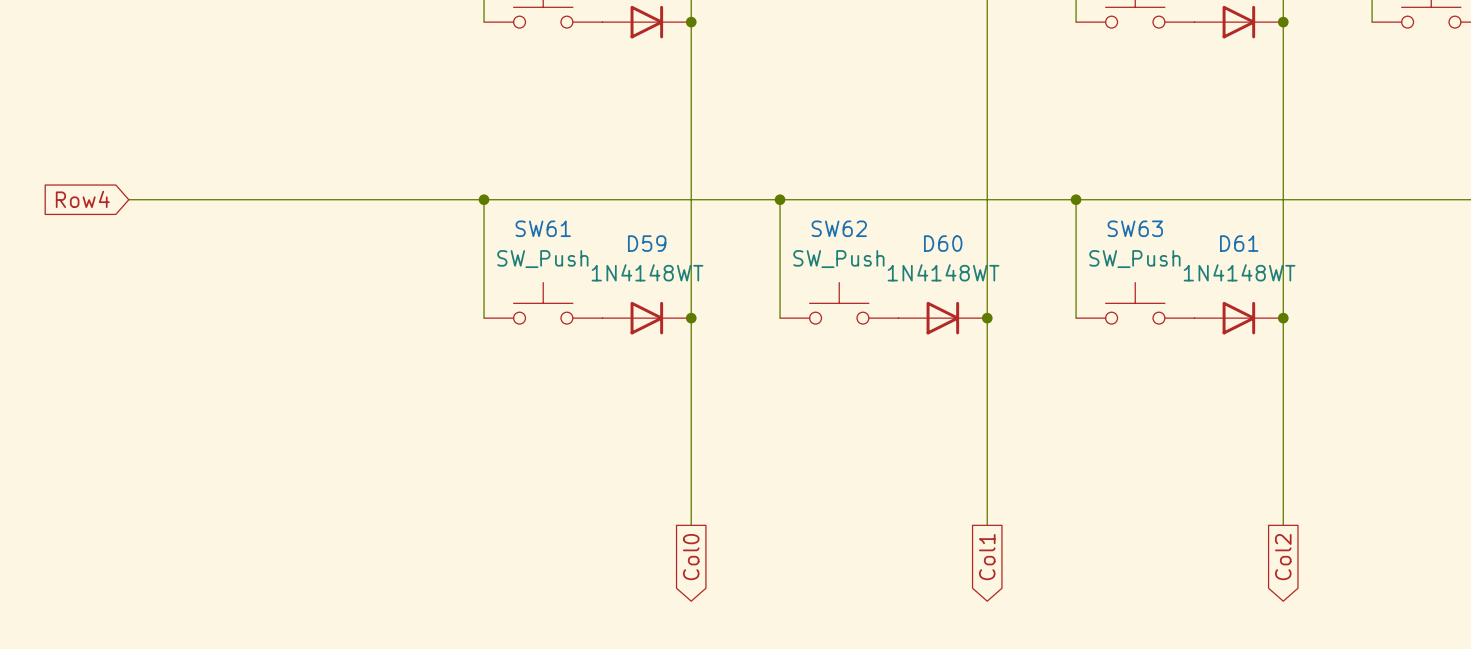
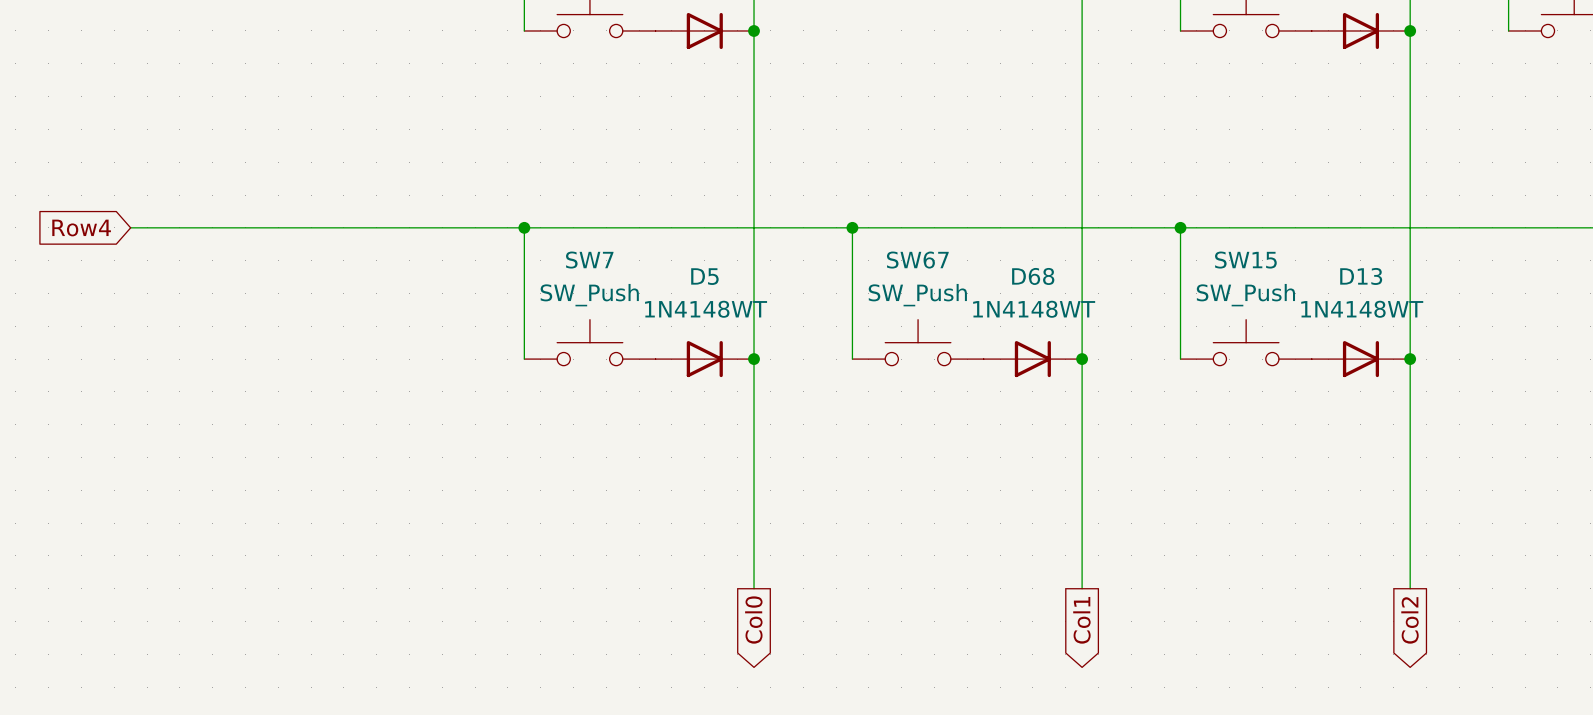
SW61 name: SW61 (543, 228) -> SW7 (589, 260)
SW62 name: SW62 (839, 228) -> SW67 (917, 260)
SW63 name: SW63 (1135, 228) -> SW15 (1245, 260)
D59 name: D59 (647, 243) -> D5 (704, 276)
D60 name: D60 (943, 243) -> D68 (1033, 276)
D61 name: D61 (1239, 243) -> D13 (1361, 276)

